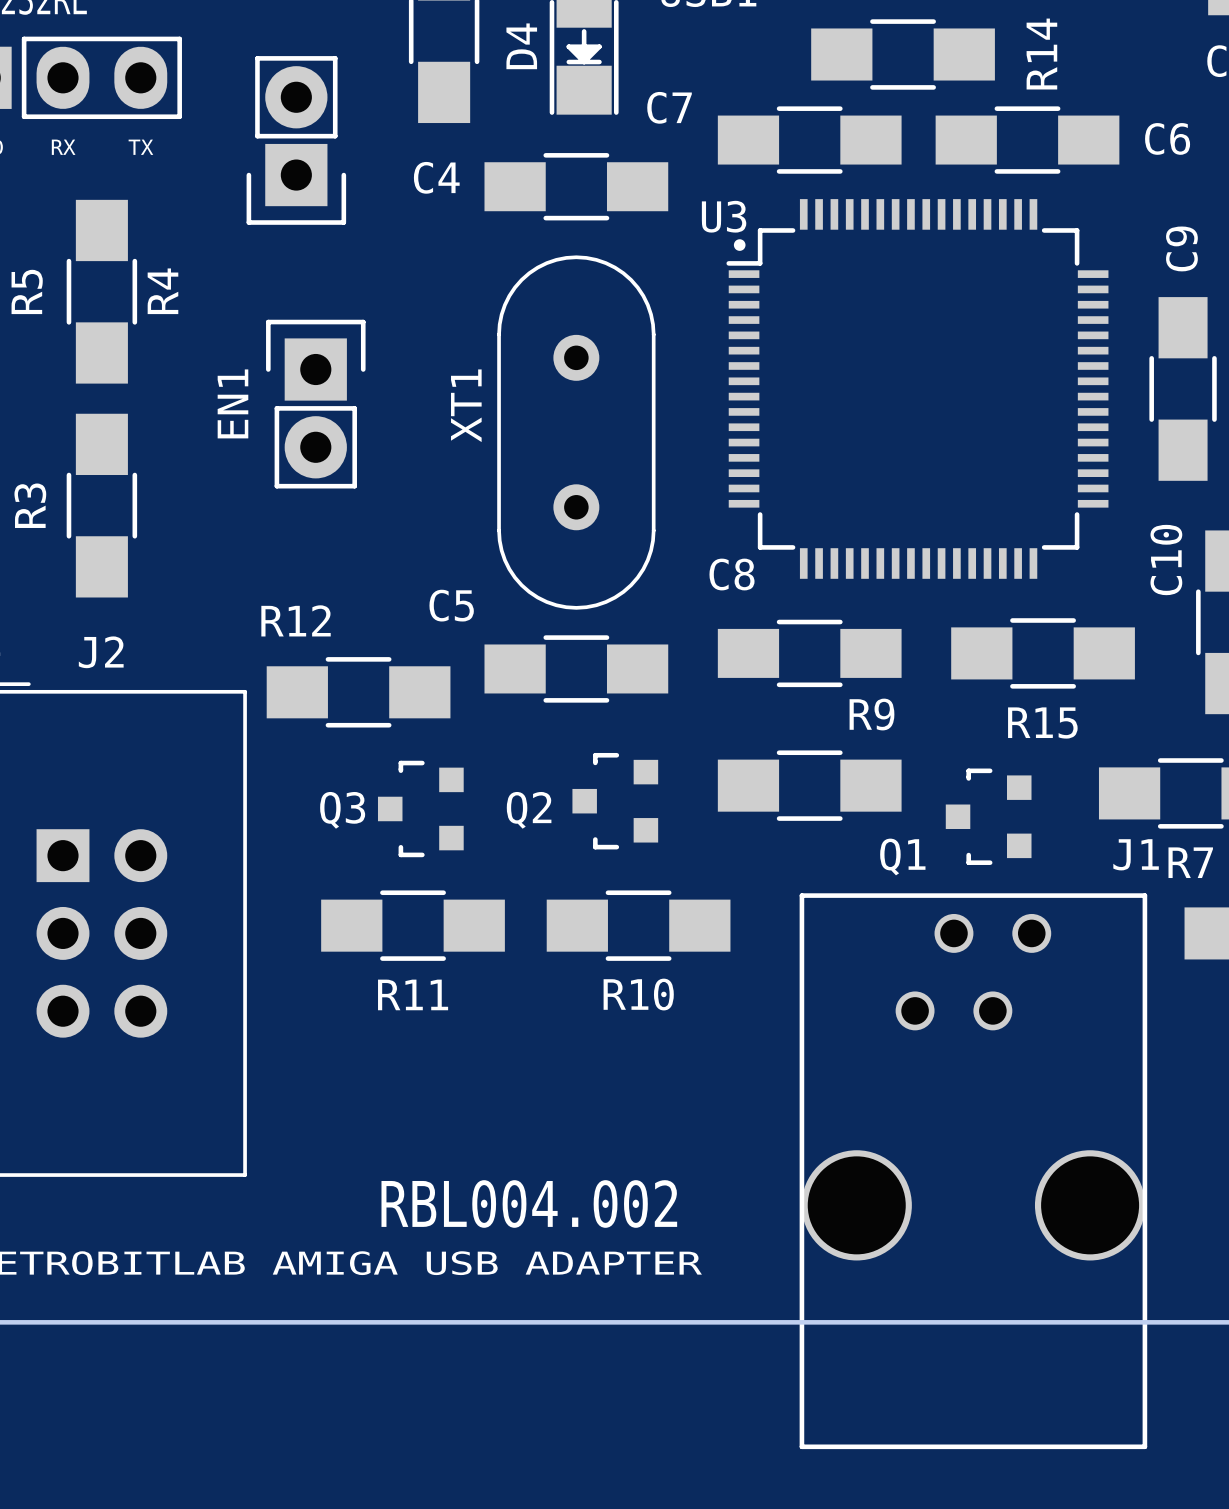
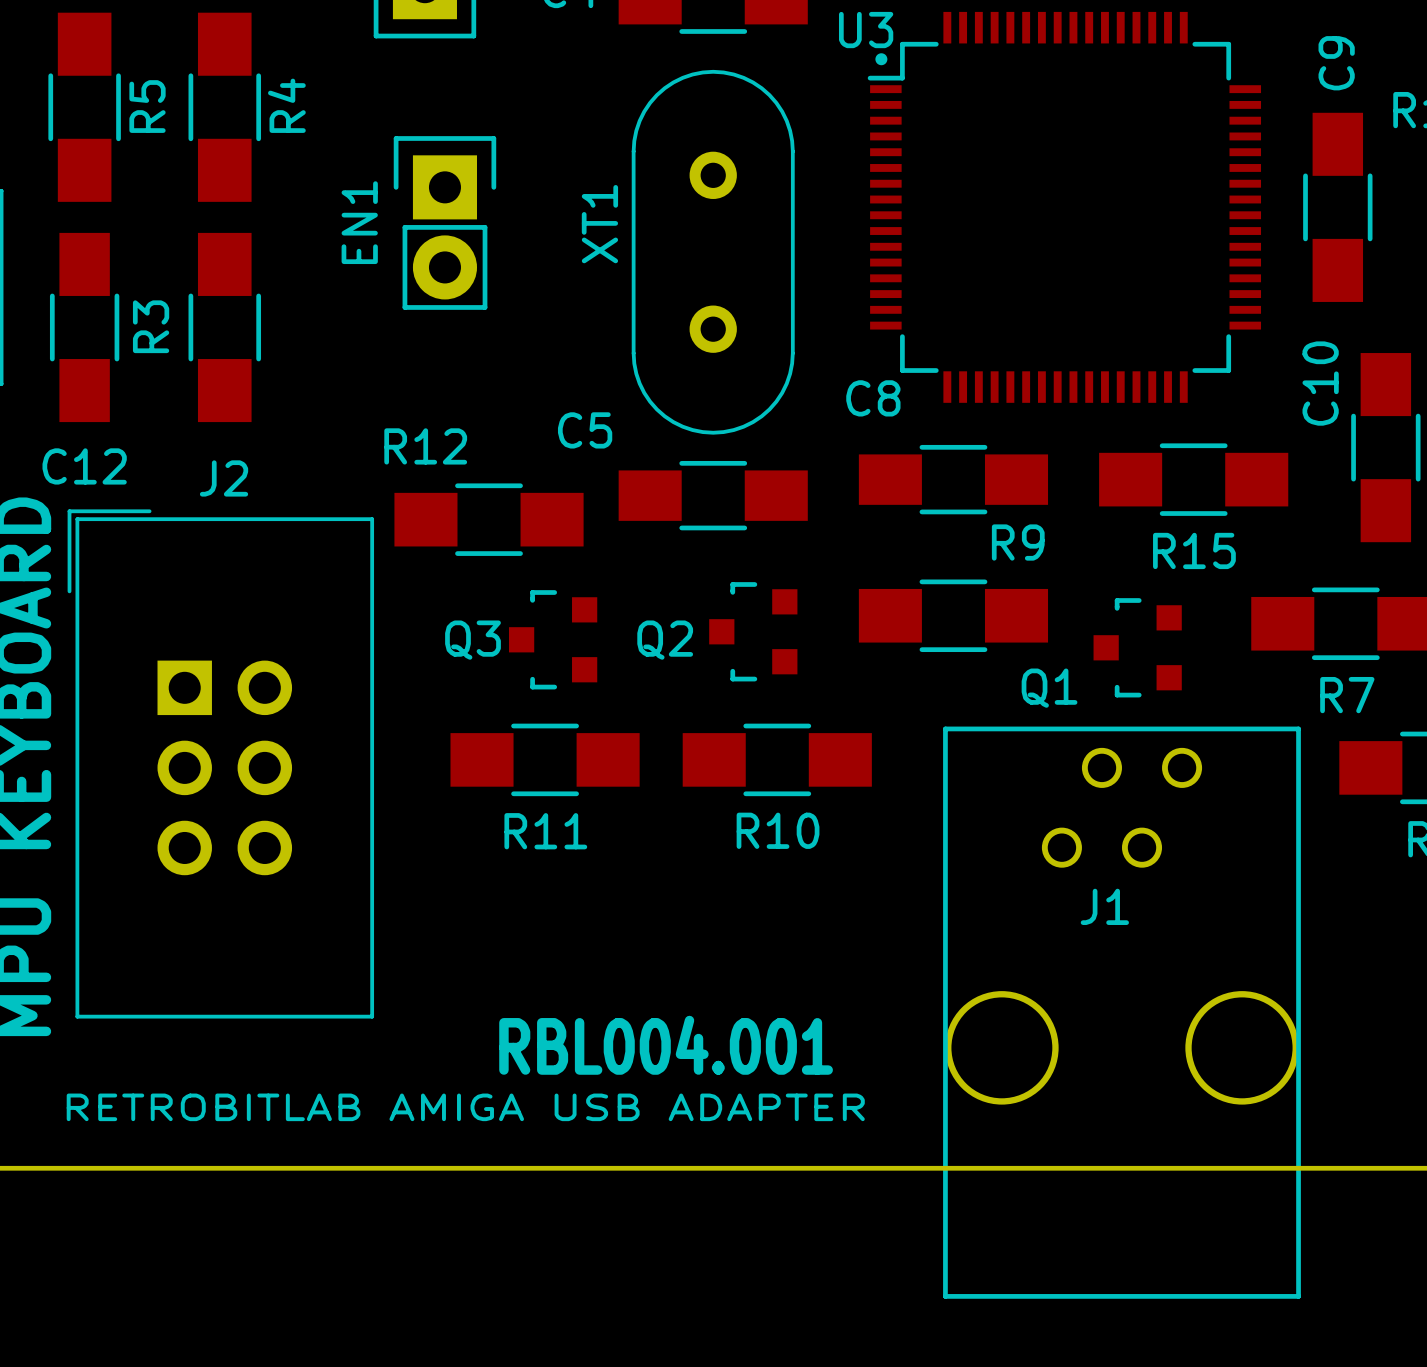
J1 name position: J1 (1136, 854) -> J1 (1104, 906)
text: RBL004.002 (529, 1203) -> RBL004.001 (666, 1045)

